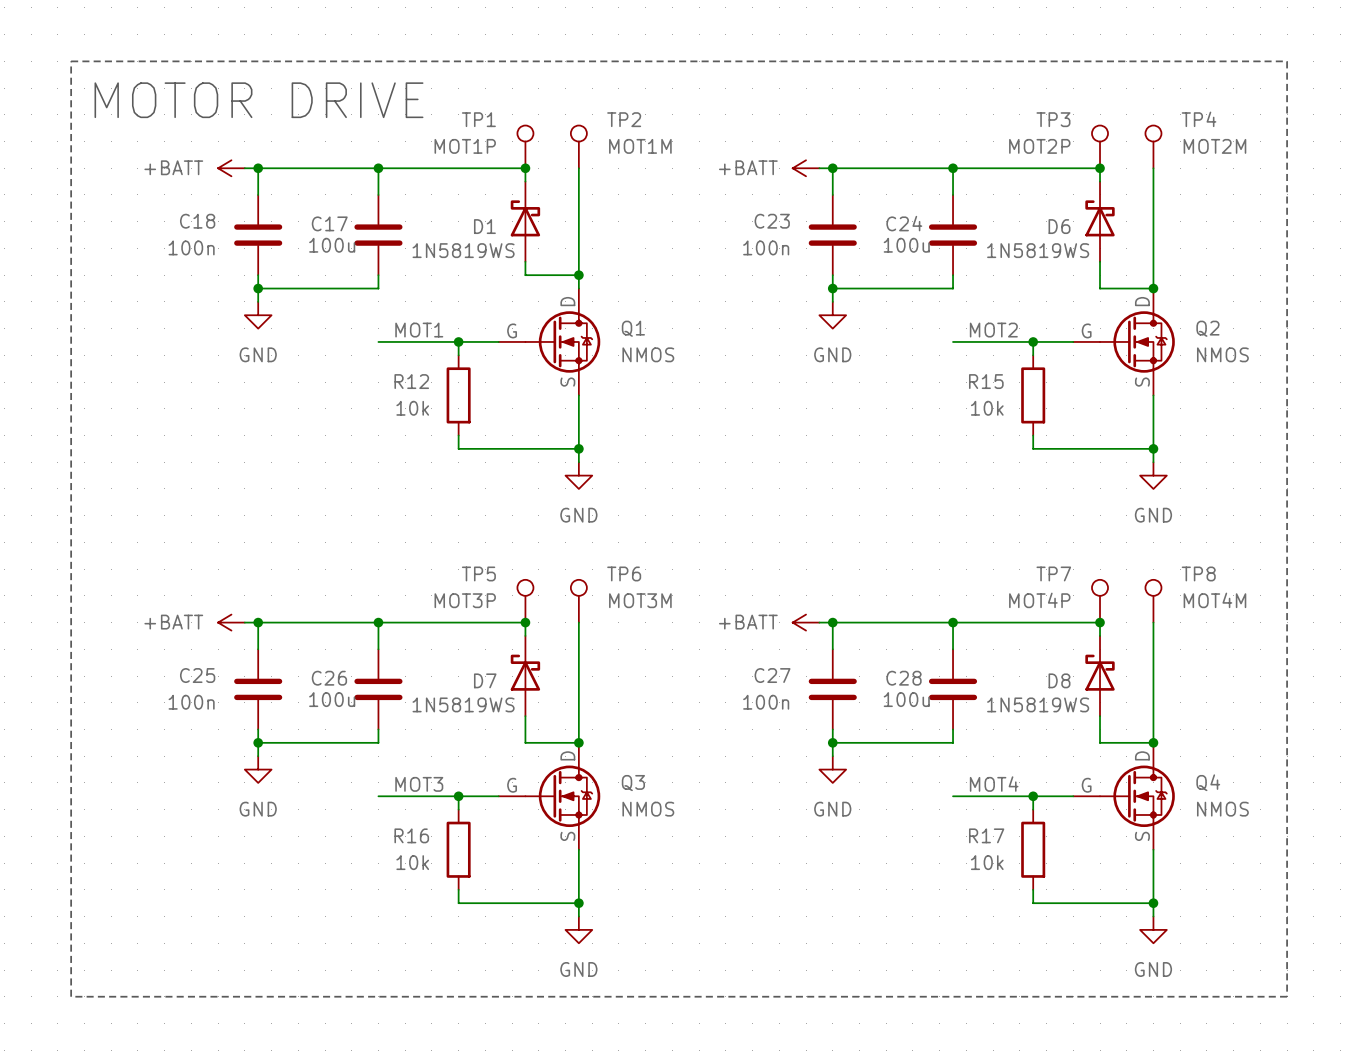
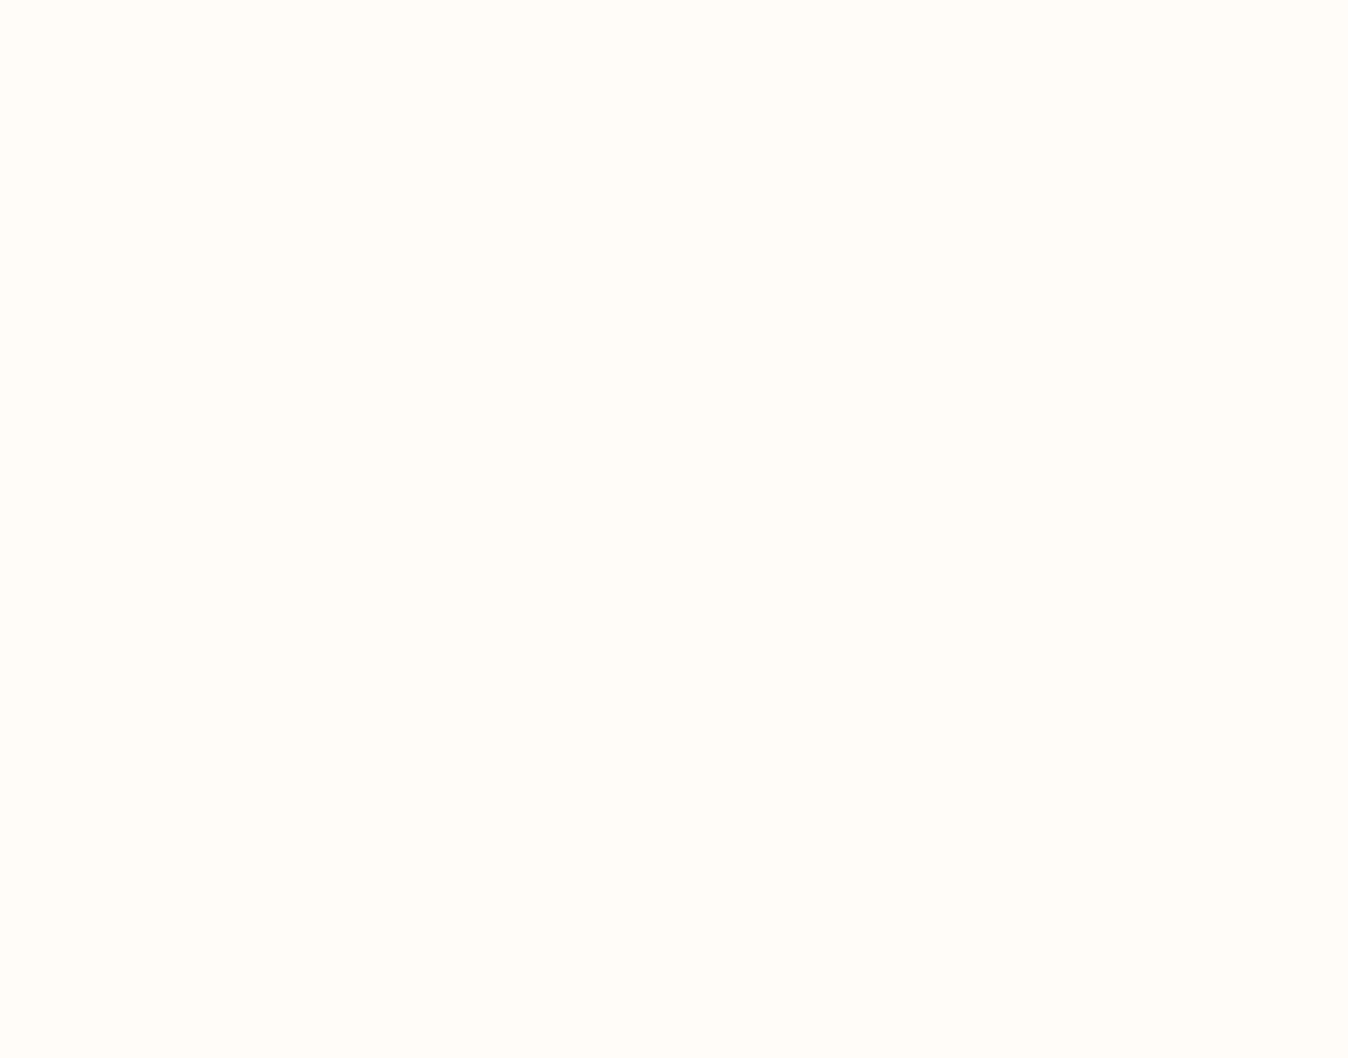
line: (71, 61) (1287, 61) (1287, 996) (71, 996) (71, 61) -> none
text: MOTOR DRIVE (259, 100) -> none
TP1: MOT1P (525, 146) -> none
TP2: MOT1M (578, 146) -> none
TP3: MOT2P (1100, 146) -> none
TP4: MOT2M (1153, 146) -> none
power symbol: +BATT (231, 168) -> none
wire: (244, 168) (525, 168) (525, 181) -> none
wire: (258, 168) (258, 194) -> none
junction: (258, 168) -> none
wire: (378, 168) (378, 194) -> none
junction: (378, 168) -> none
junction: (525, 168) -> none
wire: (578, 168) (578, 288) -> none
power symbol: +BATT (806, 168) -> none
wire: (819, 168) (1100, 168) (1100, 181) -> none
wire: (832, 168) (832, 194) -> none
junction: (832, 168) -> none
wire: (953, 168) (953, 194) -> none
junction: (953, 168) -> none
junction: (1100, 168) -> none
wire: (1153, 168) (1153, 288) (1100, 288) (1100, 261) -> none
D1: 1N5819WS (525, 221) -> none
D6: 1N5819WS (1100, 221) -> none
C18: 100n (258, 235) -> none
C17: 100u (378, 235) -> none
C23: 100n (832, 235) -> none
C24: 100u (953, 235) -> none
wire: (525, 261) (525, 275) (578, 275) -> none
wire: (258, 275) (258, 301) -> none
wire: (378, 275) (378, 288) (258, 288) -> none
junction: (578, 275) -> none
wire: (832, 275) (832, 301) -> none
wire: (953, 275) (953, 288) (832, 288) -> none
junction: (258, 288) -> none
junction: (832, 288) -> none
junction: (1153, 288) -> none
power symbol: GND (258, 315) -> none
power symbol: GND (832, 315) -> none
label: MOT1 (419, 330) -> none
label: MOT2 (993, 330) -> none
wire: (378, 341) (498, 341) -> none
wire: (458, 341) (458, 355) -> none
junction: (458, 341) -> none
Q1: NMOS (549, 341) -> none
wire: (953, 341) (1073, 341) -> none
wire: (1033, 341) (1033, 355) -> none
junction: (1033, 341) -> none
Q2: NMOS (1124, 341) -> none
R12: 10k (458, 395) -> none
wire: (578, 395) (578, 462) -> none
R15: 10k (1033, 395) -> none
wire: (1153, 395) (1153, 462) -> none
wire: (458, 435) (458, 448) (578, 448) -> none
wire: (1033, 435) (1033, 448) (1153, 448) -> none
junction: (578, 448) -> none
junction: (1153, 448) -> none
power symbol: GND (578, 475) -> none
power symbol: GND (1153, 475) -> none
TP5: MOT3P (525, 601) -> none
TP6: MOT3M (578, 601) -> none
TP7: MOT4P (1100, 601) -> none
TP8: MOT4M (1153, 601) -> none
power symbol: +BATT (231, 622) -> none
wire: (244, 622) (525, 622) (525, 635) -> none
wire: (258, 622) (258, 649) -> none
junction: (258, 622) -> none
wire: (378, 622) (378, 649) -> none
junction: (378, 622) -> none
junction: (525, 622) -> none
wire: (578, 622) (578, 742) (525, 742) (525, 716) -> none
power symbol: +BATT (806, 622) -> none
wire: (819, 622) (1100, 622) (1100, 635) -> none
wire: (832, 622) (832, 649) -> none
junction: (832, 622) -> none
wire: (953, 622) (953, 649) -> none
junction: (953, 622) -> none
junction: (1100, 622) -> none
wire: (1153, 622) (1153, 742) (1100, 742) (1100, 716) -> none
D7: 1N5819WS (525, 676) -> none
D8: 1N5819WS (1100, 676) -> none
C25: 100n (258, 689) -> none
C26: 100u (378, 689) -> none
C27: 100n (832, 689) -> none
C28: 100u (953, 689) -> none
wire: (258, 729) (258, 756) -> none
wire: (378, 729) (378, 742) (258, 742) -> none
wire: (832, 729) (832, 756) -> none
wire: (953, 729) (953, 742) (832, 742) -> none
junction: (258, 742) -> none
junction: (578, 742) -> none
junction: (832, 742) -> none
junction: (1153, 742) -> none
power symbol: GND (258, 769) -> none
power symbol: GND (832, 769) -> none
label: MOT3 (419, 784) -> none
label: MOT4 (994, 784) -> none
wire: (378, 796) (498, 796) -> none
wire: (458, 796) (458, 809) -> none
junction: (458, 796) -> none
Q3: NMOS (549, 796) -> none
wire: (953, 796) (1073, 796) -> none
wire: (1033, 796) (1033, 809) -> none
junction: (1033, 796) -> none
Q4: NMOS (1124, 796) -> none
R16: 10k (458, 849) -> none
wire: (578, 849) (578, 916) -> none
R17: 10k (1033, 849) -> none
wire: (1153, 849) (1153, 916) -> none
wire: (458, 889) (458, 903) (578, 903) -> none
wire: (1033, 889) (1033, 903) (1153, 903) -> none
junction: (578, 903) -> none
junction: (1153, 903) -> none
power symbol: GND (578, 929) -> none
power symbol: GND (1153, 929) -> none

